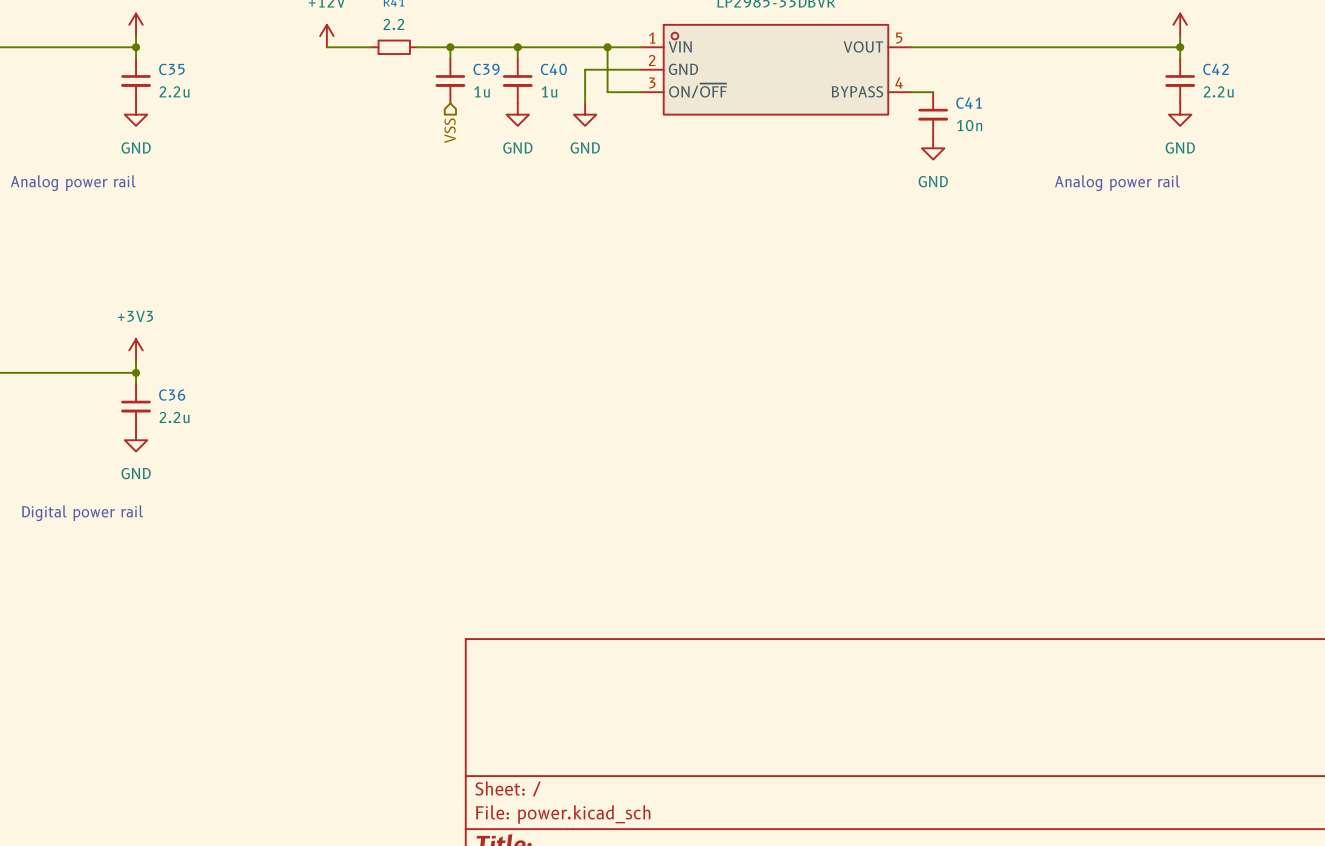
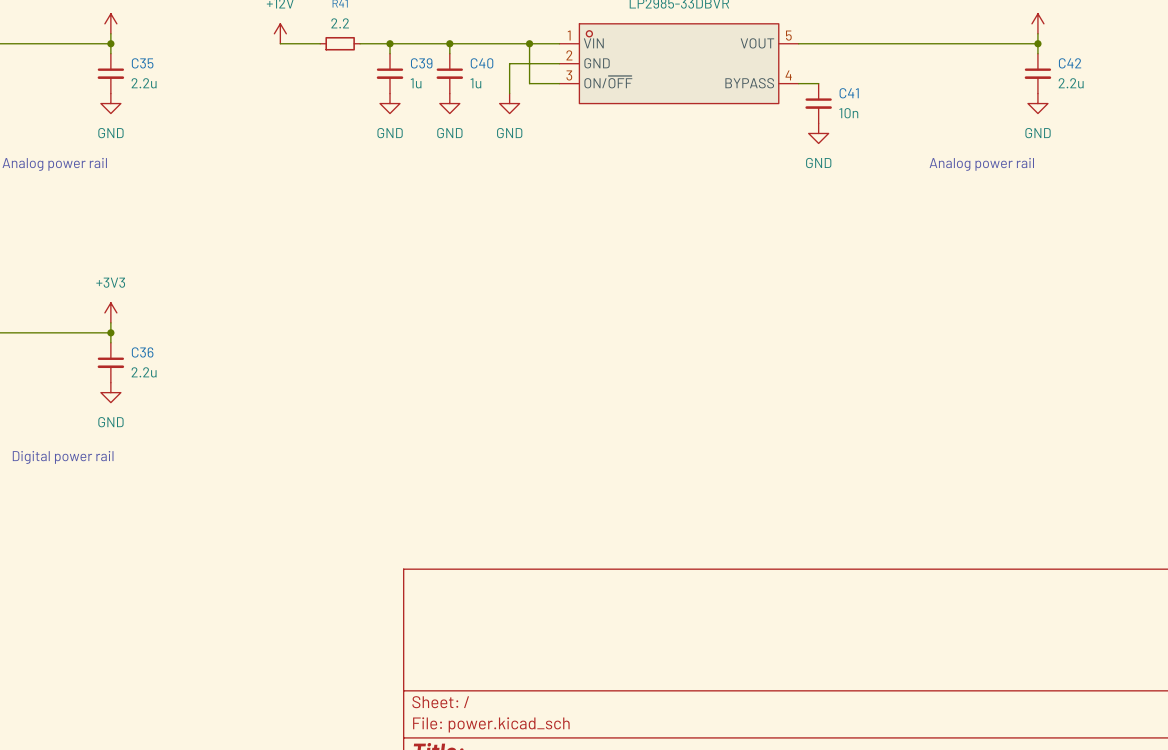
power symbol: none -> GND (390, 103)
hierarchical label: VSS (450, 130) -> none

